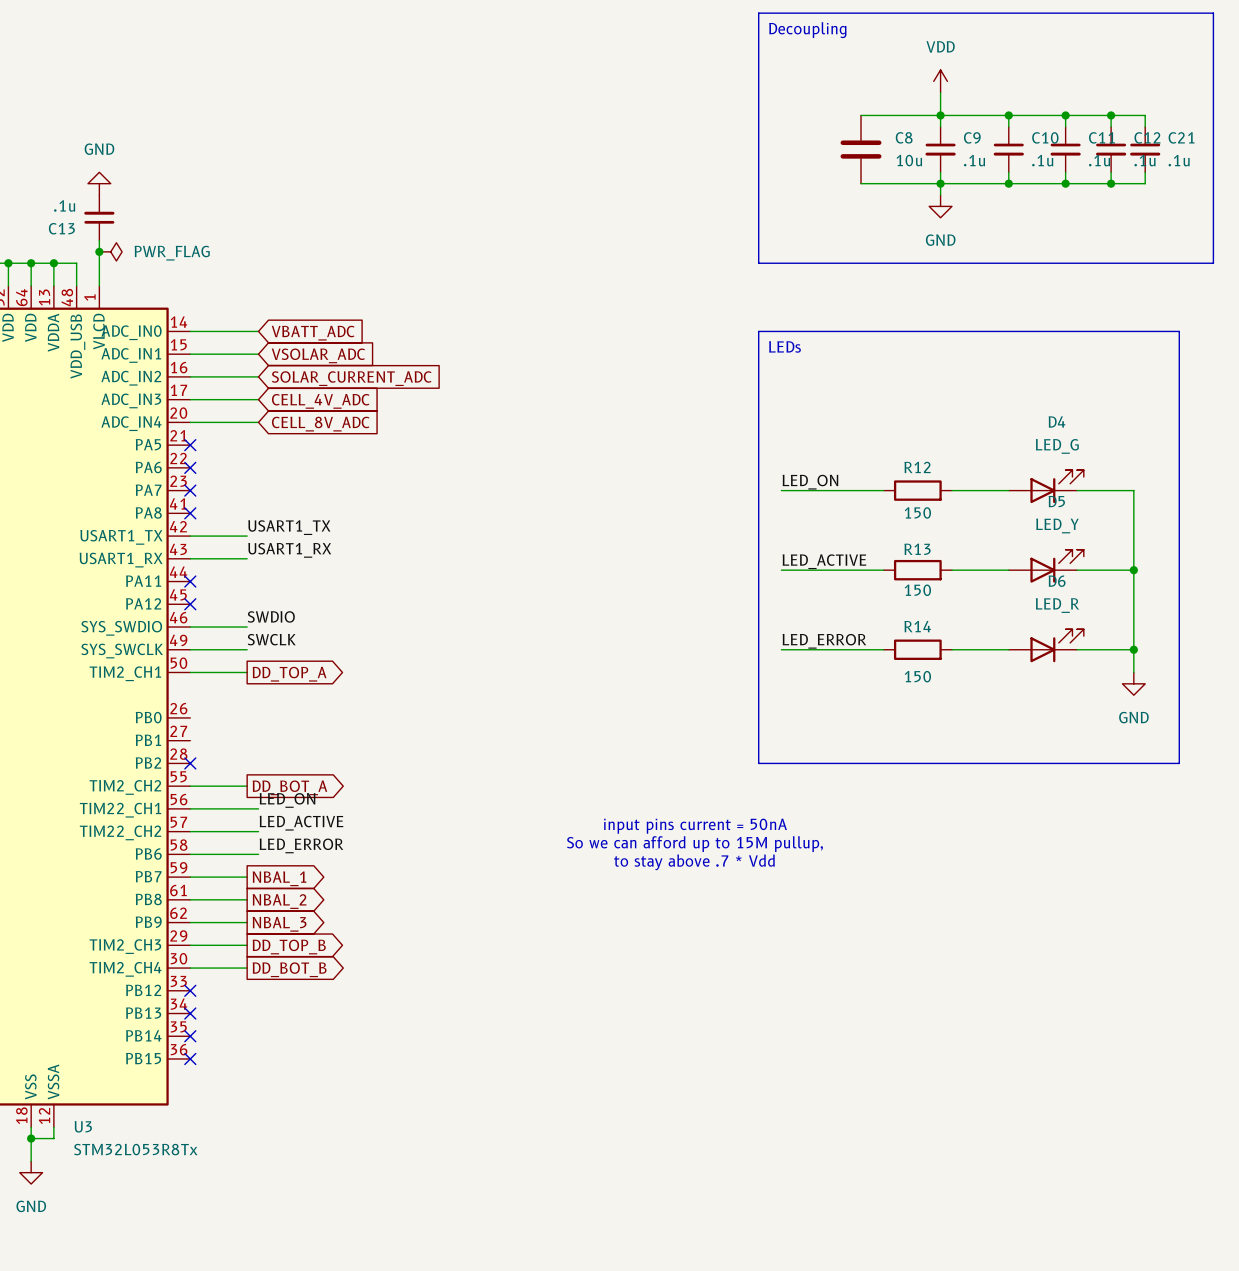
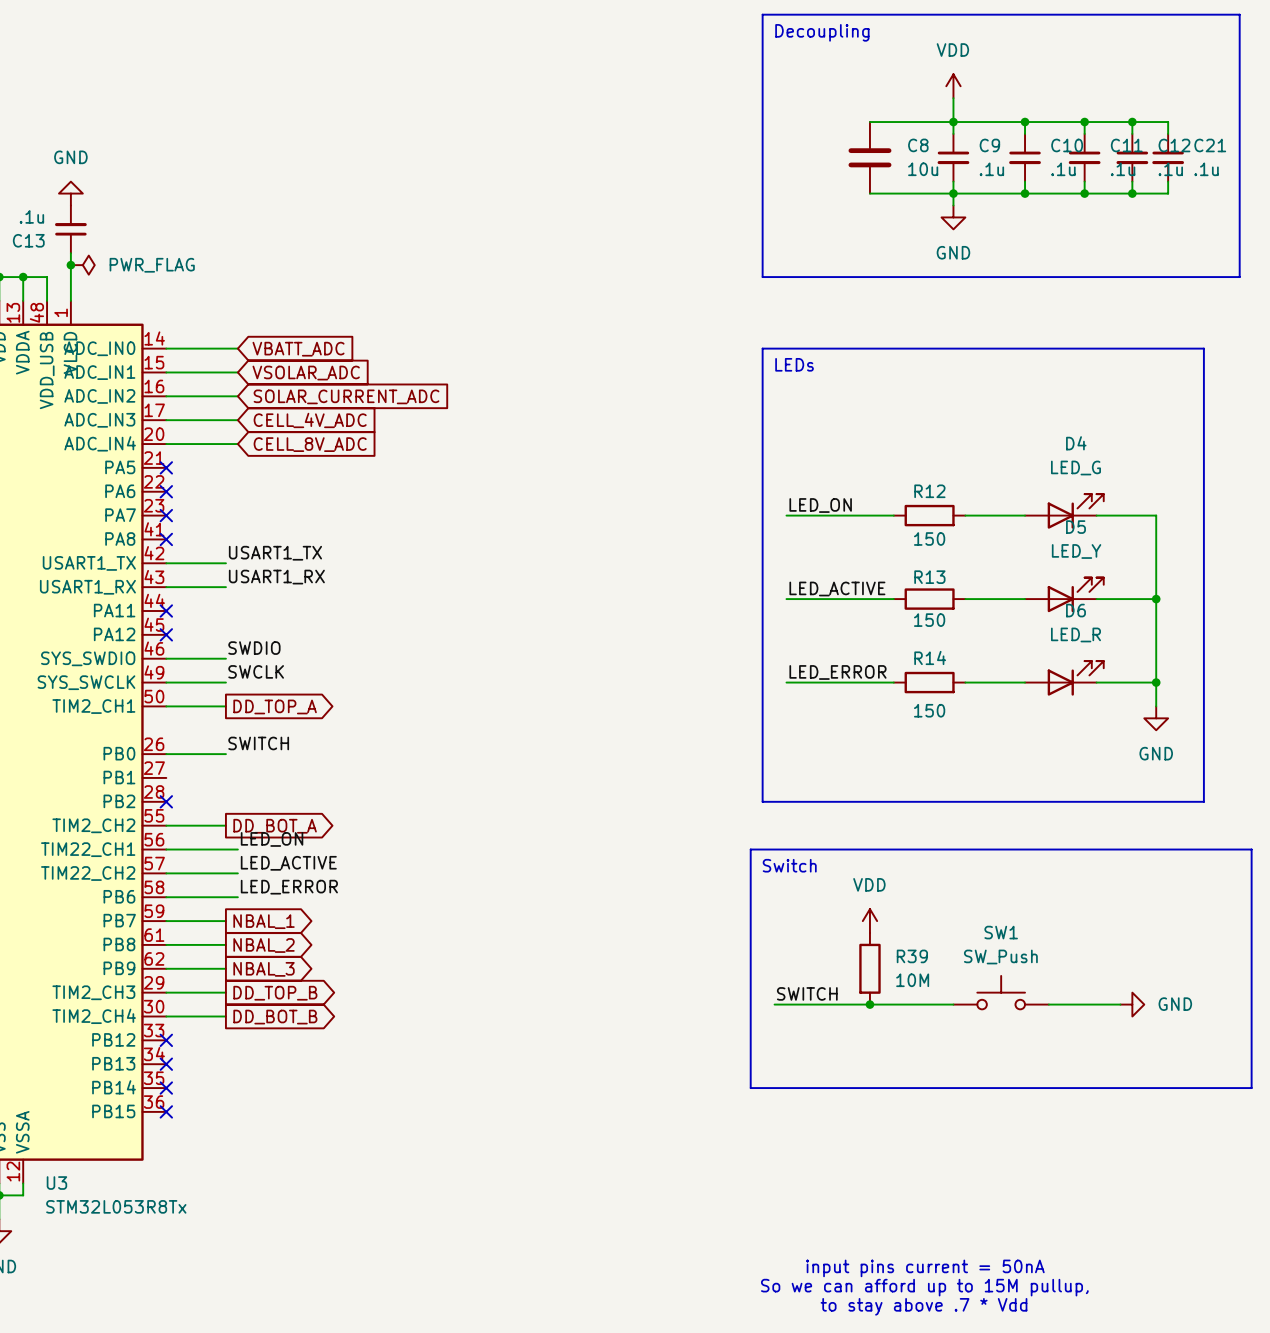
label: none -> SWITCH (258, 743)
wire: none -> (166, 754) (225, 754)
line: none -> (750, 849) (1251, 849) (1251, 1088) (750, 1088) (750, 849)
text: none -> Switch (789, 865)
text: input pins current = 50nA (695, 826) -> none
text: So we can afford up to 15M pullup, (694, 844) -> none
text: to stay above .7 * Vdd (694, 862) -> none
power symbol: none -> VDD (869, 921)
R39: none -> 10M (869, 968)
SW1: none -> SW_Push (1001, 992)
label: none -> SWITCH (807, 993)
wire: none -> (774, 1004) (953, 1004)
junction: none -> (869, 1004)
wire: none -> (1048, 1004) (1120, 1004)
power symbol: none -> GND (1132, 1004)
text: none -> input pins current = 50nA (925, 1268)
text: none -> So we can afford up to 15M pullup, (924, 1287)
text: none -> to stay above .7 * Vdd (923, 1306)

